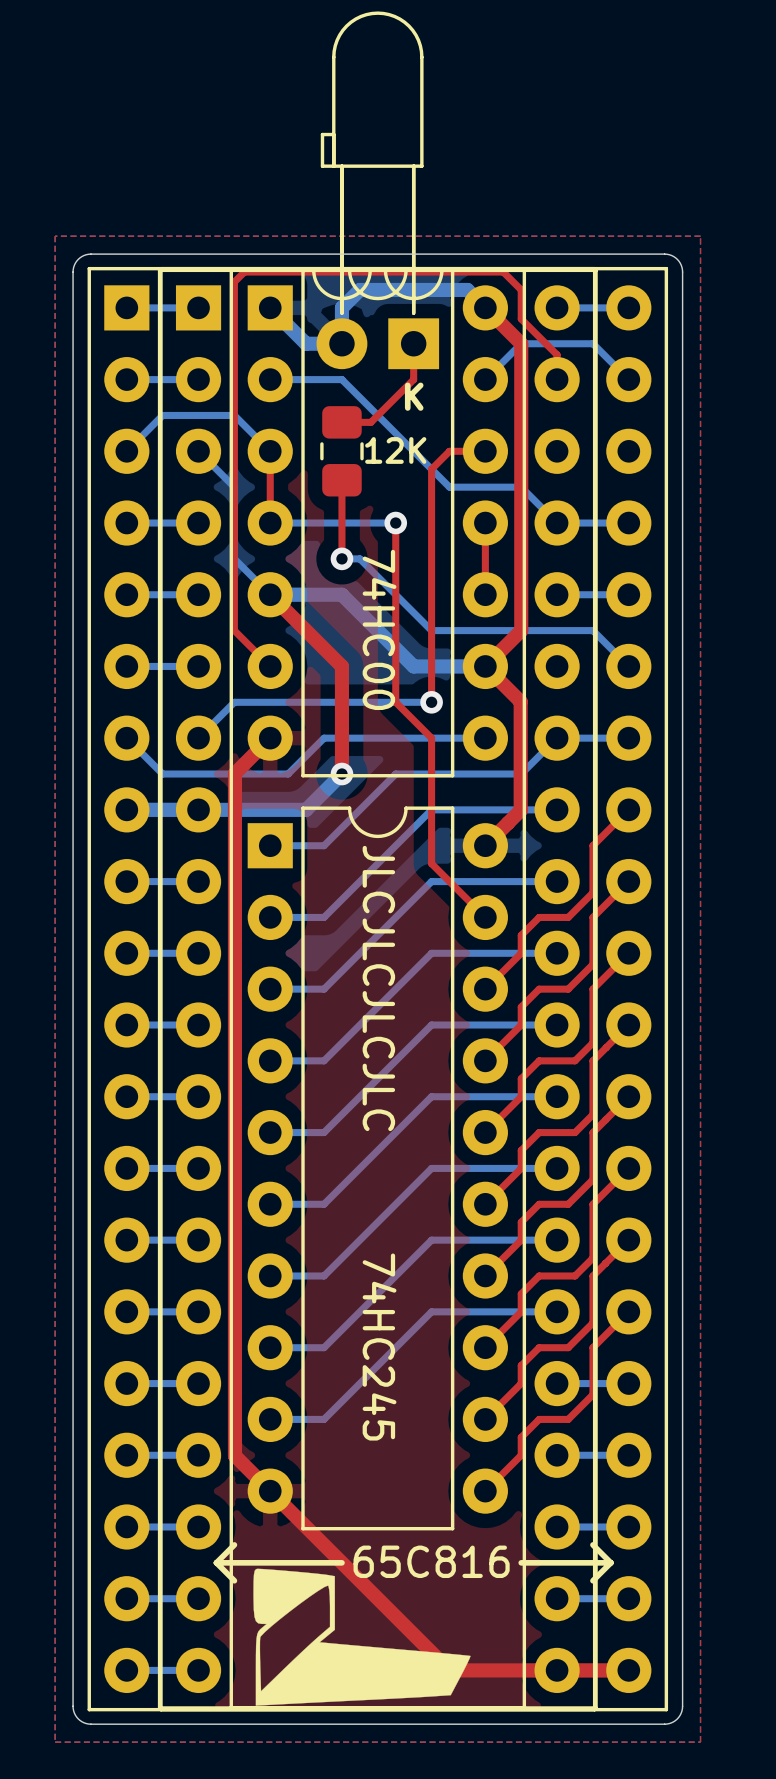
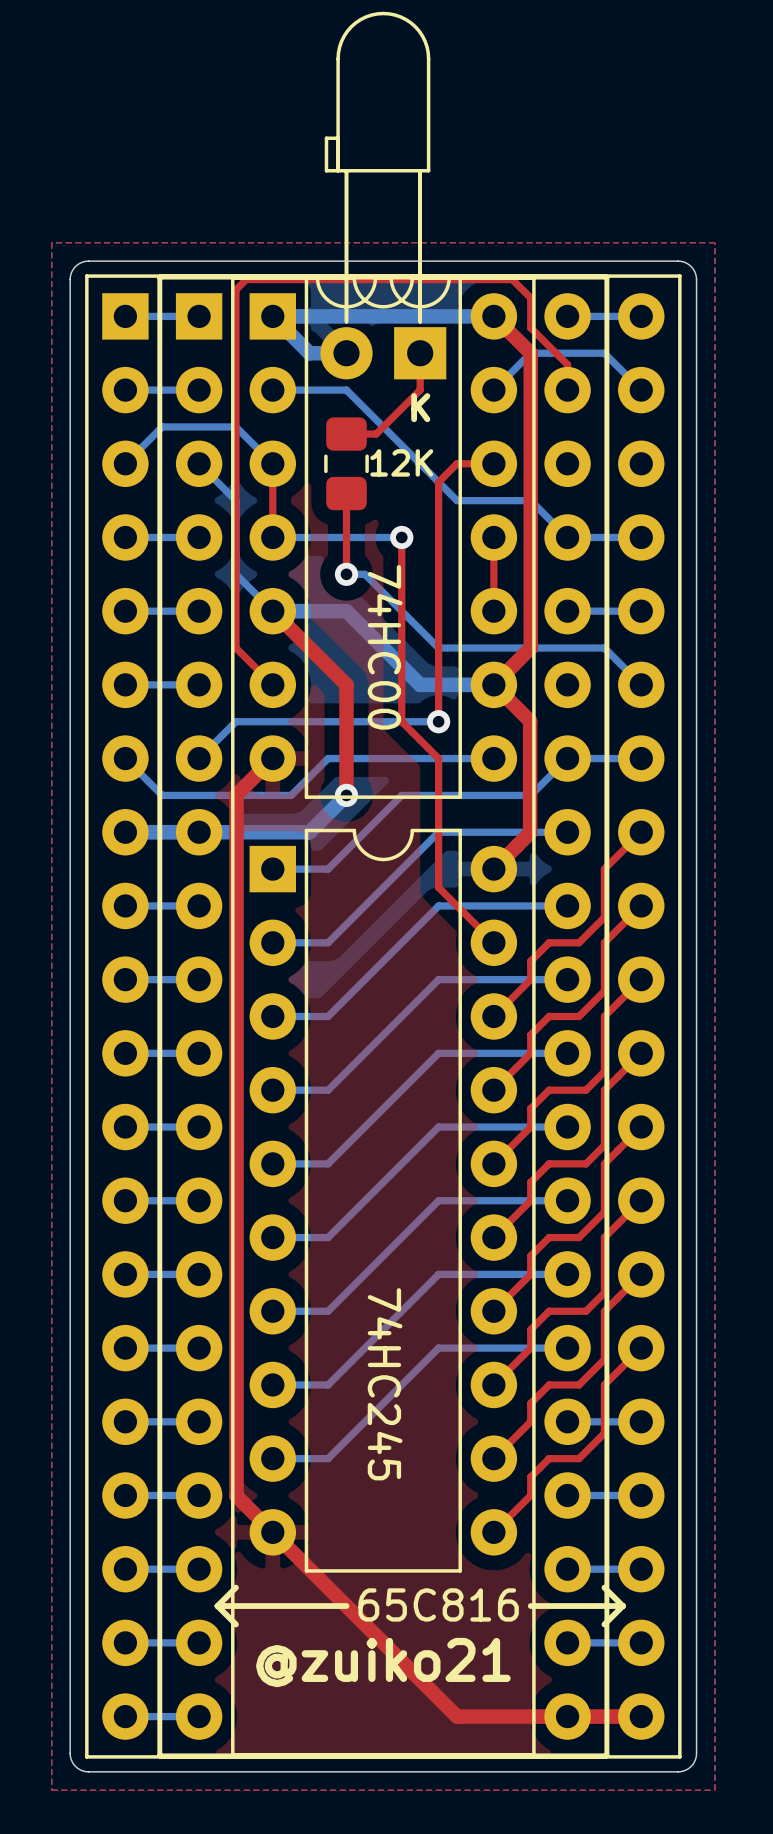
bottom track: (485, 307) (467, 289) (359, 289) (341, 307) (341, 343) -> (493, 316) (272, 316)
text: JLCJLCJLCJLC (378, 988) -> none
drawing: [253, 1568, 471, 1706] -> none
text: none -> @zuiko21 (383, 1662)

